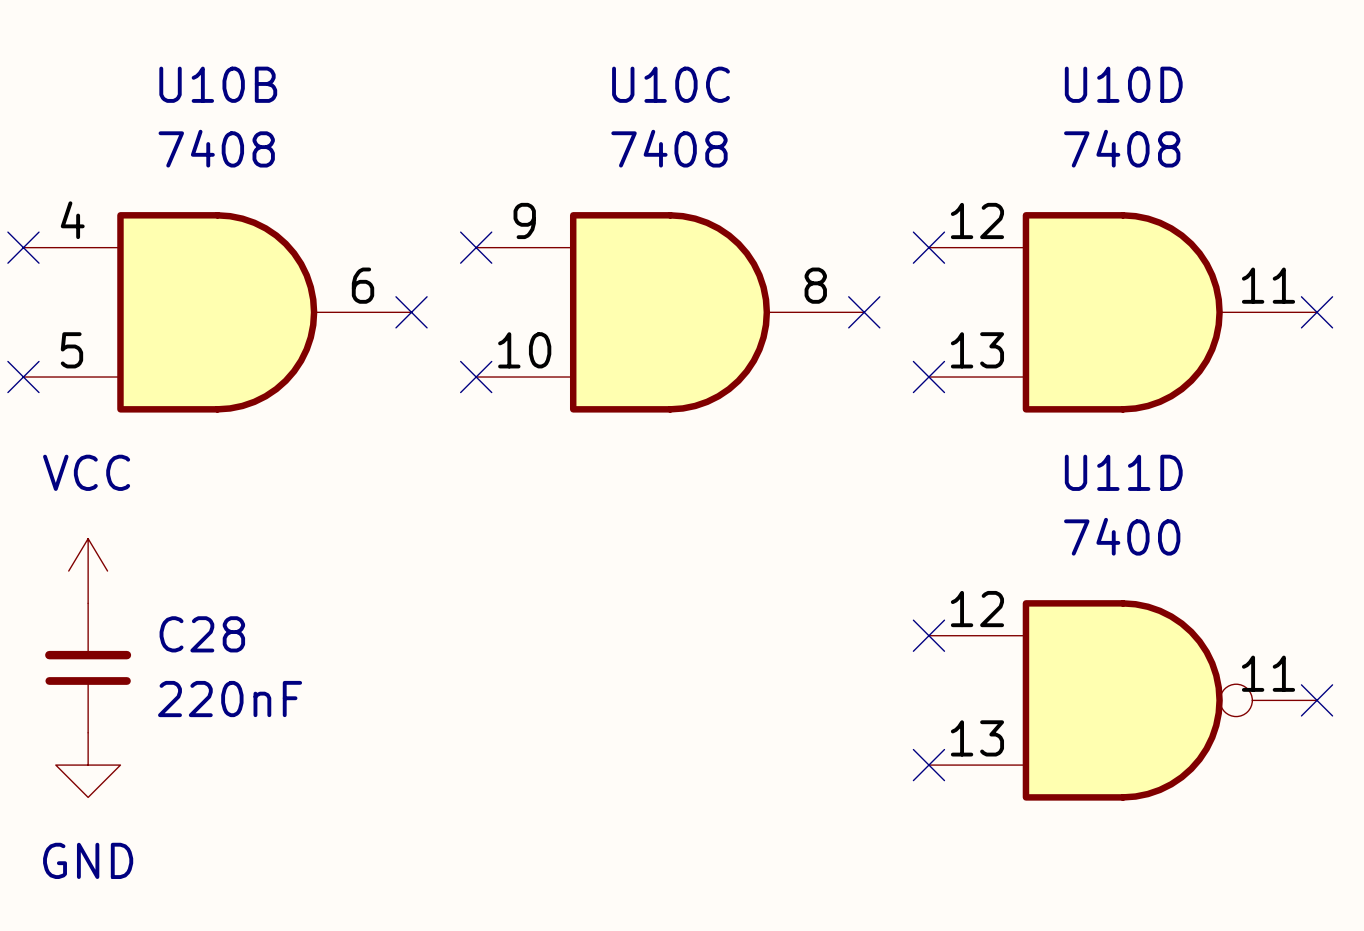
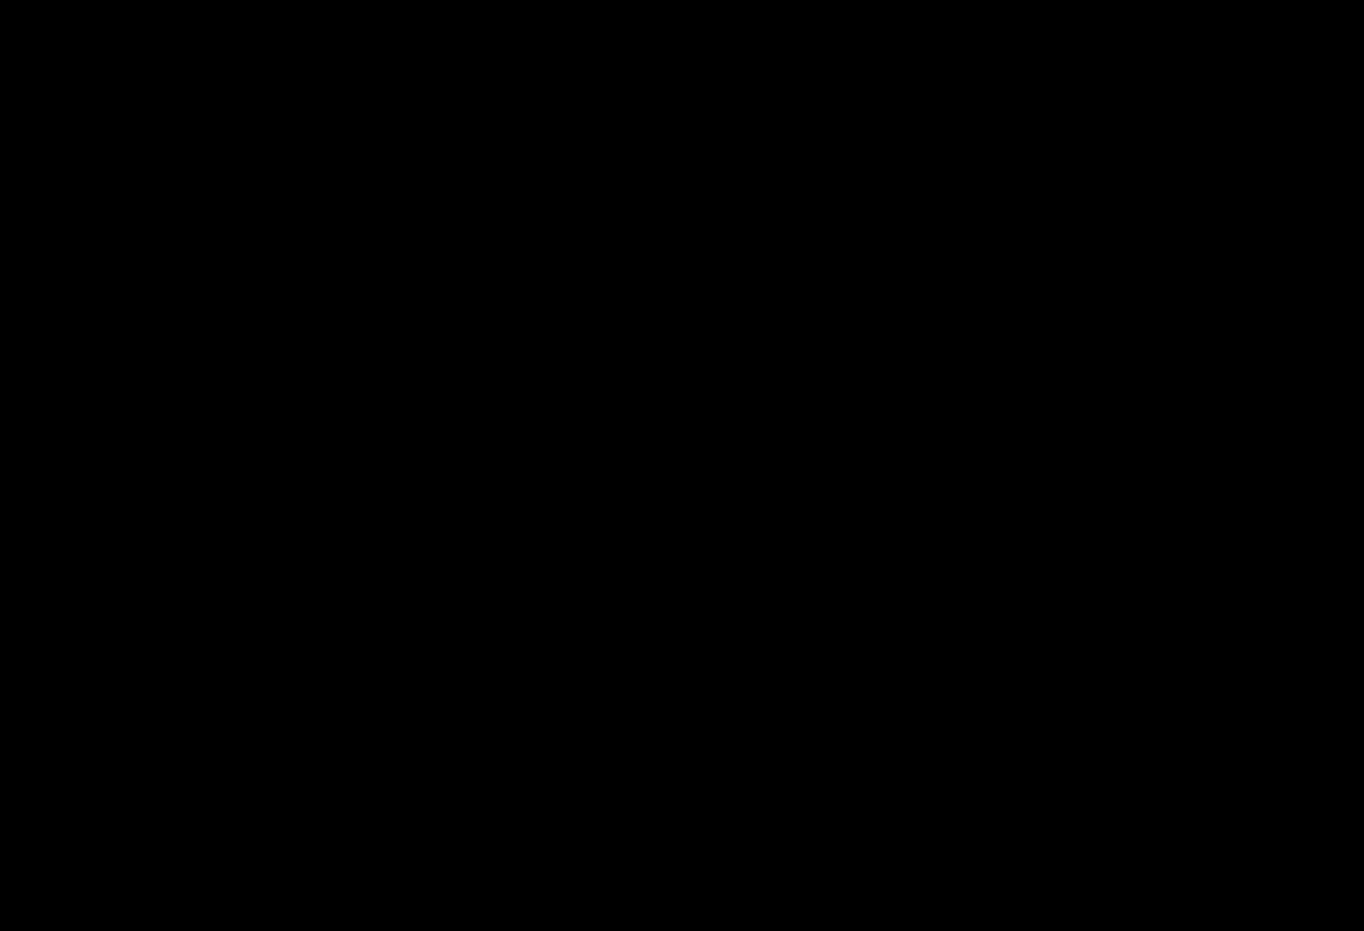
no-connect mark: (23, 247) -> none
no-connect mark: (476, 247) -> none
no-connect mark: (928, 247) -> none
U10B: 7408 (217, 312) -> none
no-connect mark: (411, 312) -> none
U10C: 7408 (670, 312) -> none
no-connect mark: (864, 312) -> none
U10D: 7408 (1122, 312) -> none
no-connect mark: (1317, 312) -> none
no-connect mark: (23, 377) -> none
no-connect mark: (476, 377) -> none
no-connect mark: (928, 377) -> none
power symbol: VCC (88, 571) -> none
no-connect mark: (928, 635) -> none
C28: 220nF (88, 668) -> none
U11D: 7400 (1122, 700) -> none
no-connect mark: (1317, 700) -> none
power symbol: GND (88, 765) -> none
no-connect mark: (928, 765) -> none

